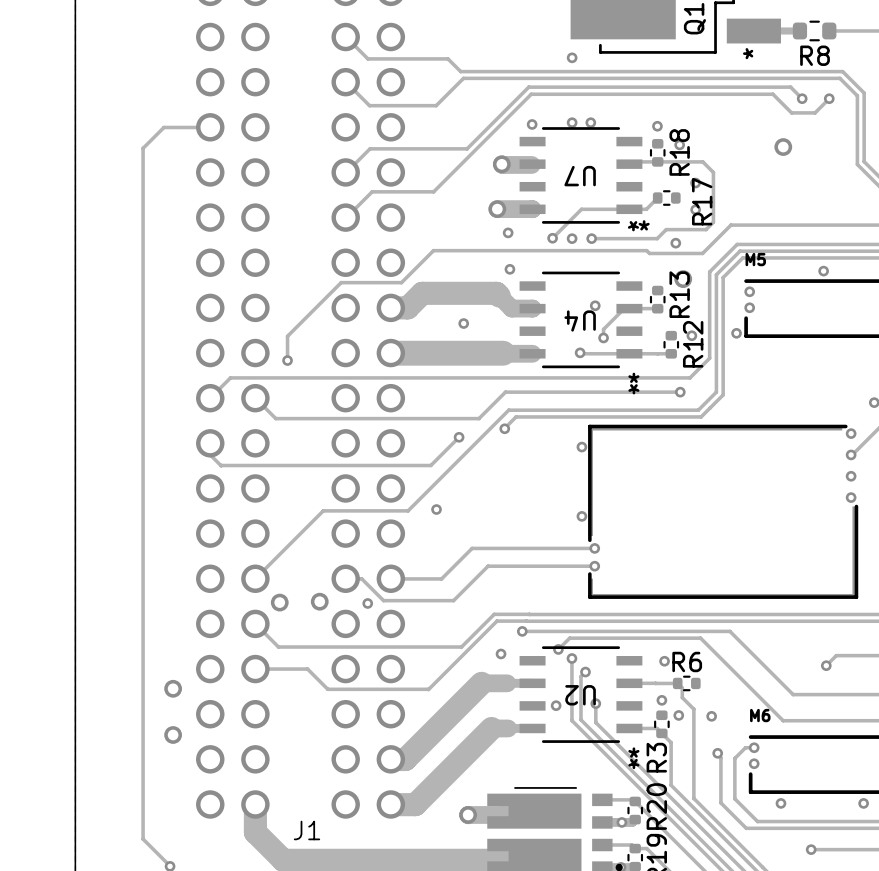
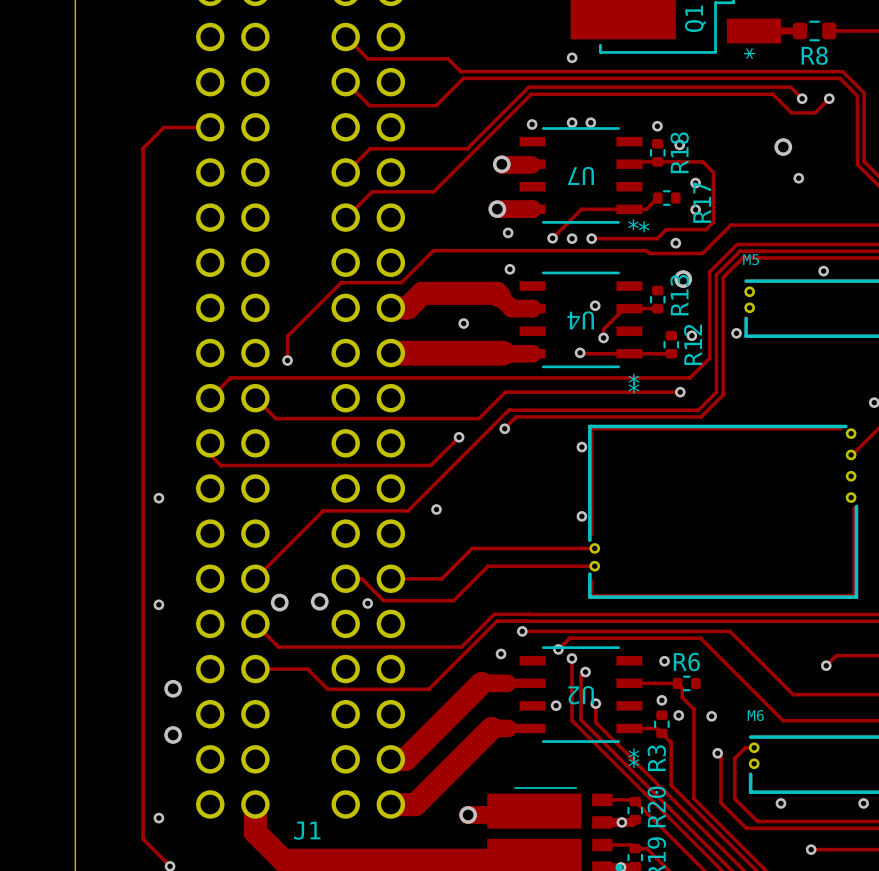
via: none -> (798, 178)
via: none -> (158, 498)
via: none -> (158, 604)
via: none -> (158, 818)

